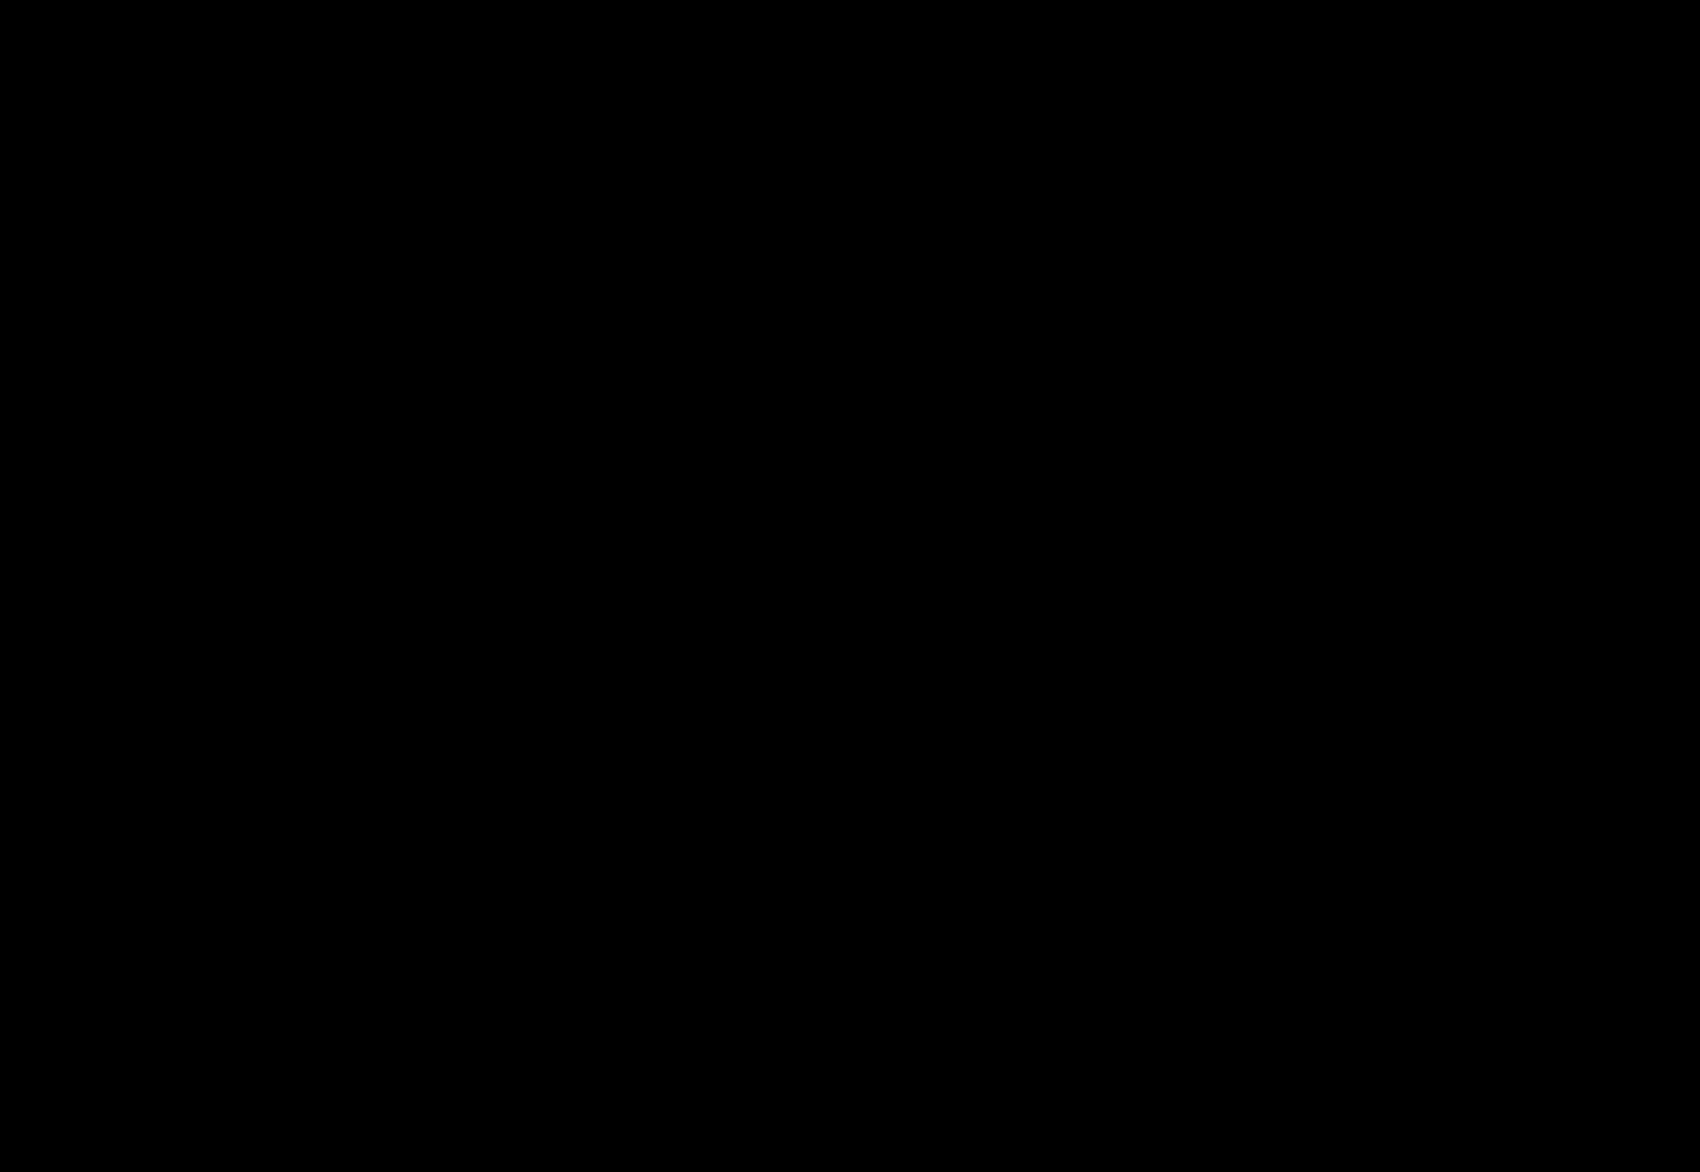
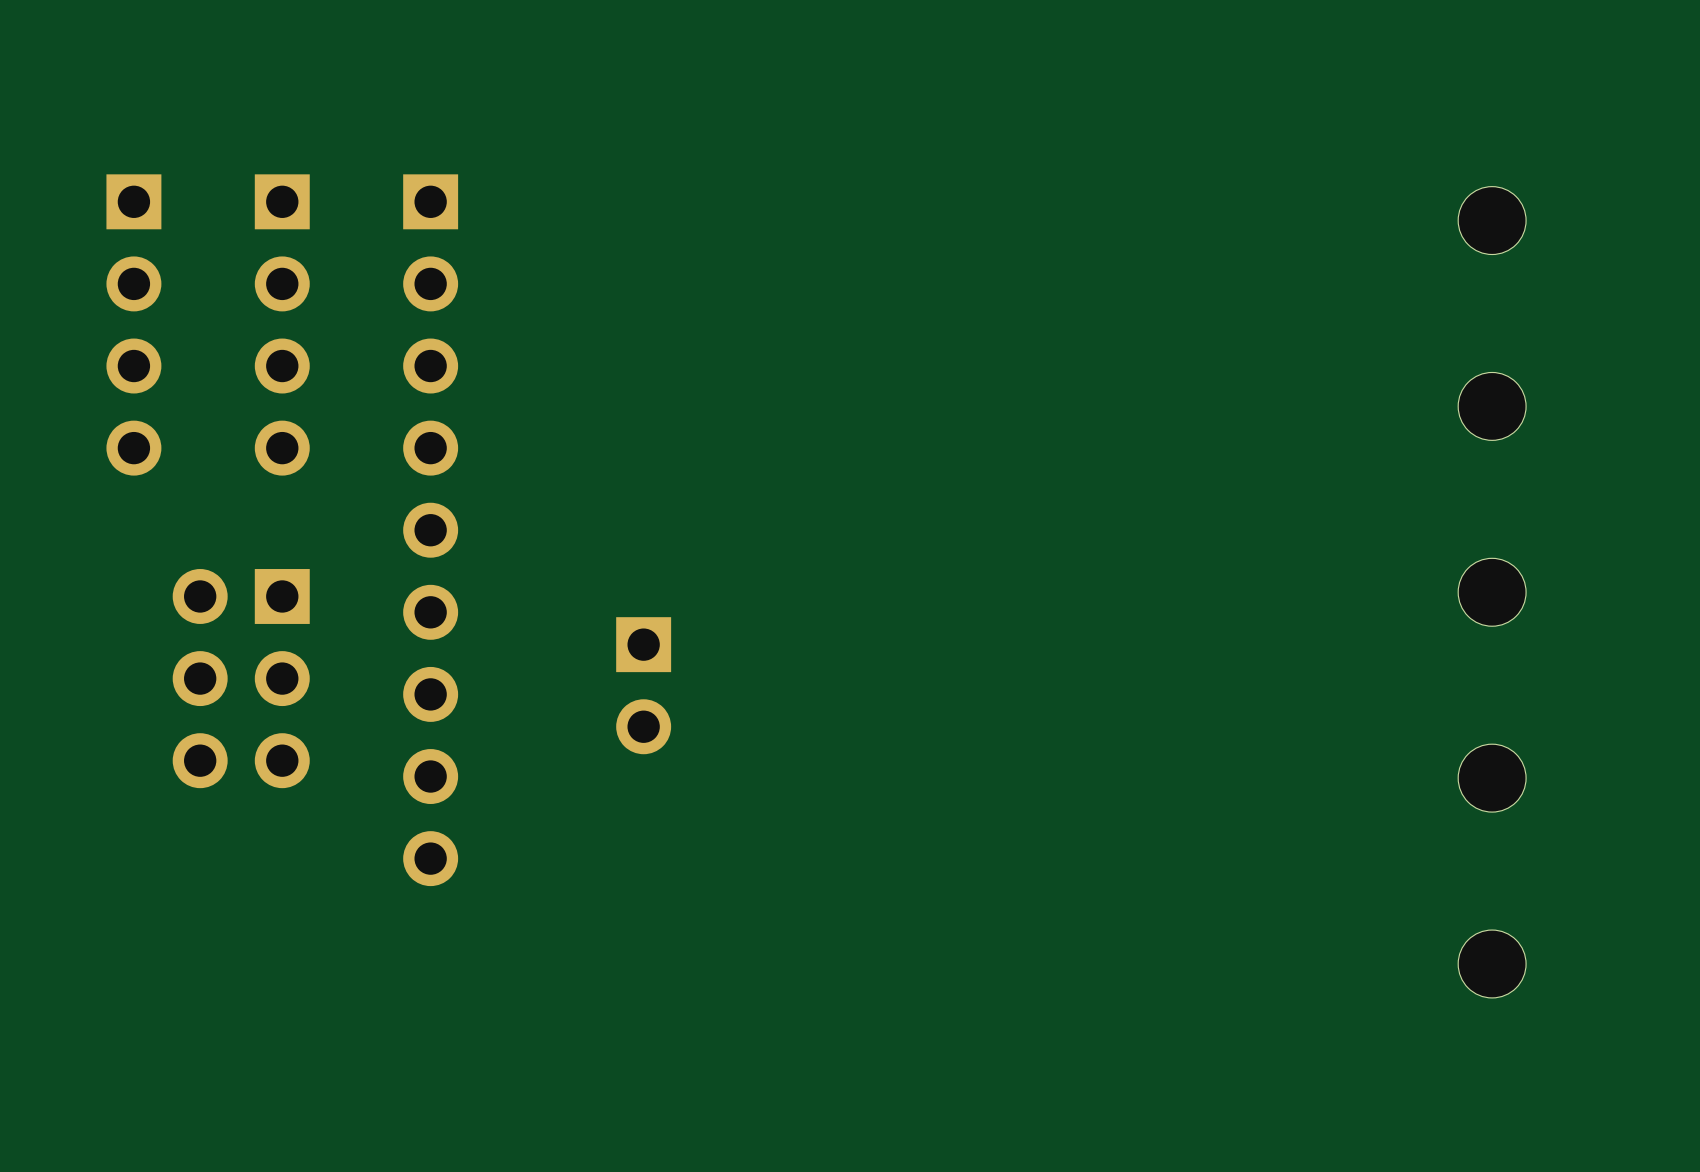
part: none -> (1492, 220)
part: none -> (133, 324)
part: none -> (282, 324)
part: none -> (1492, 406)
part: none -> (430, 530)
part: none -> (1492, 592)
part: none -> (241, 678)
part: none -> (643, 685)
part: none -> (1492, 778)
part: none -> (1492, 963)

